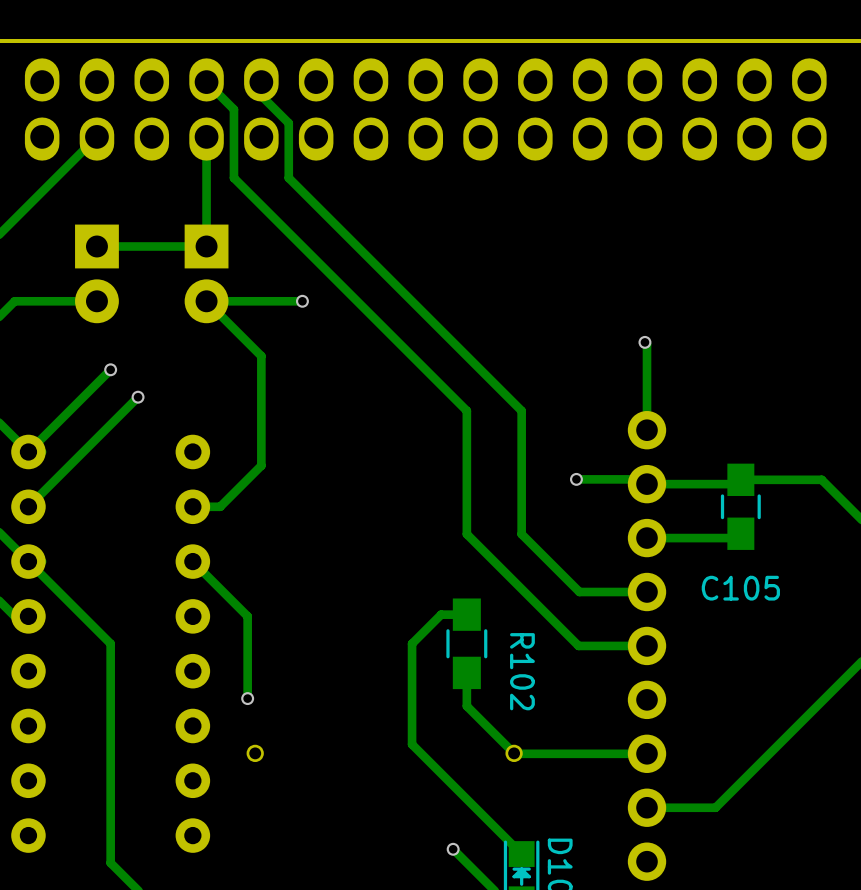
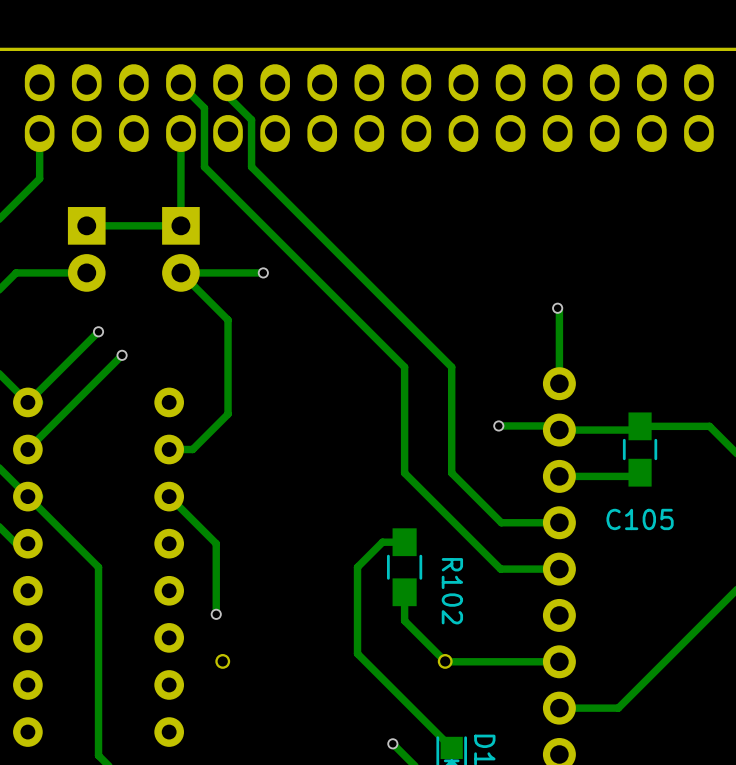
track: (96, 136) (42, 191) -> (39, 131) (39, 178)

